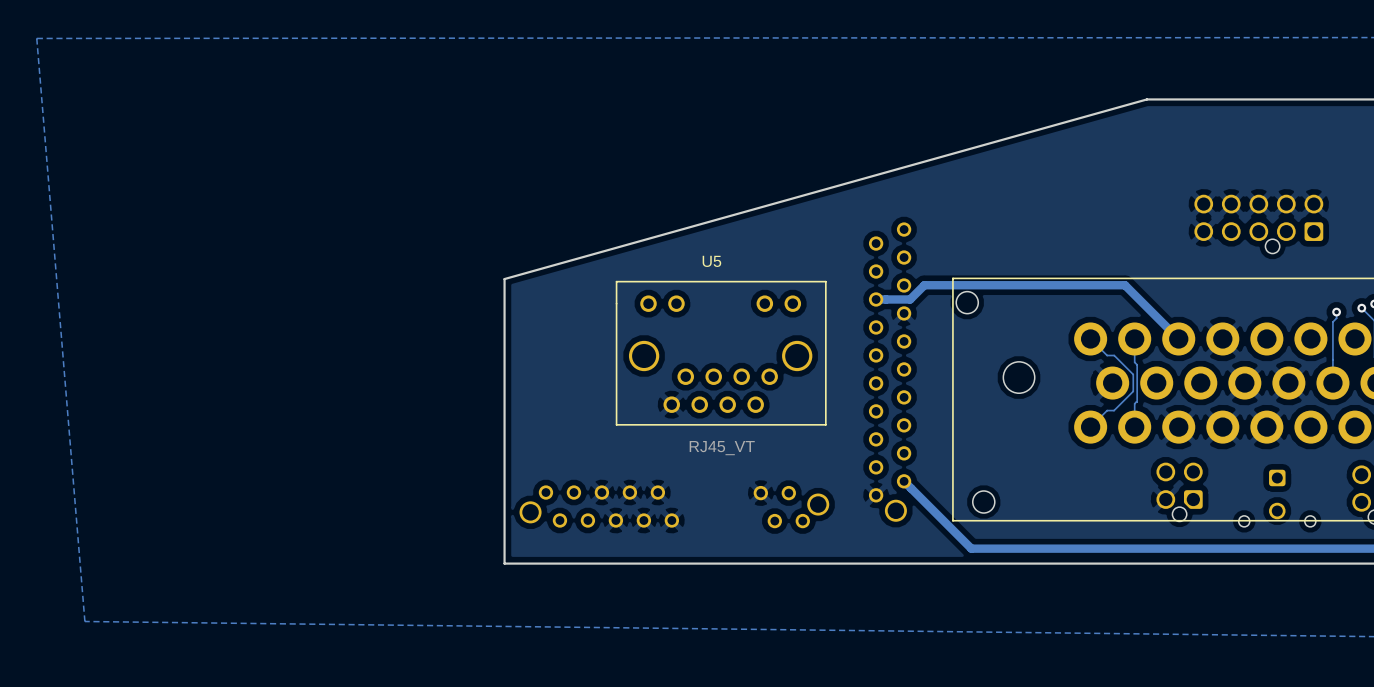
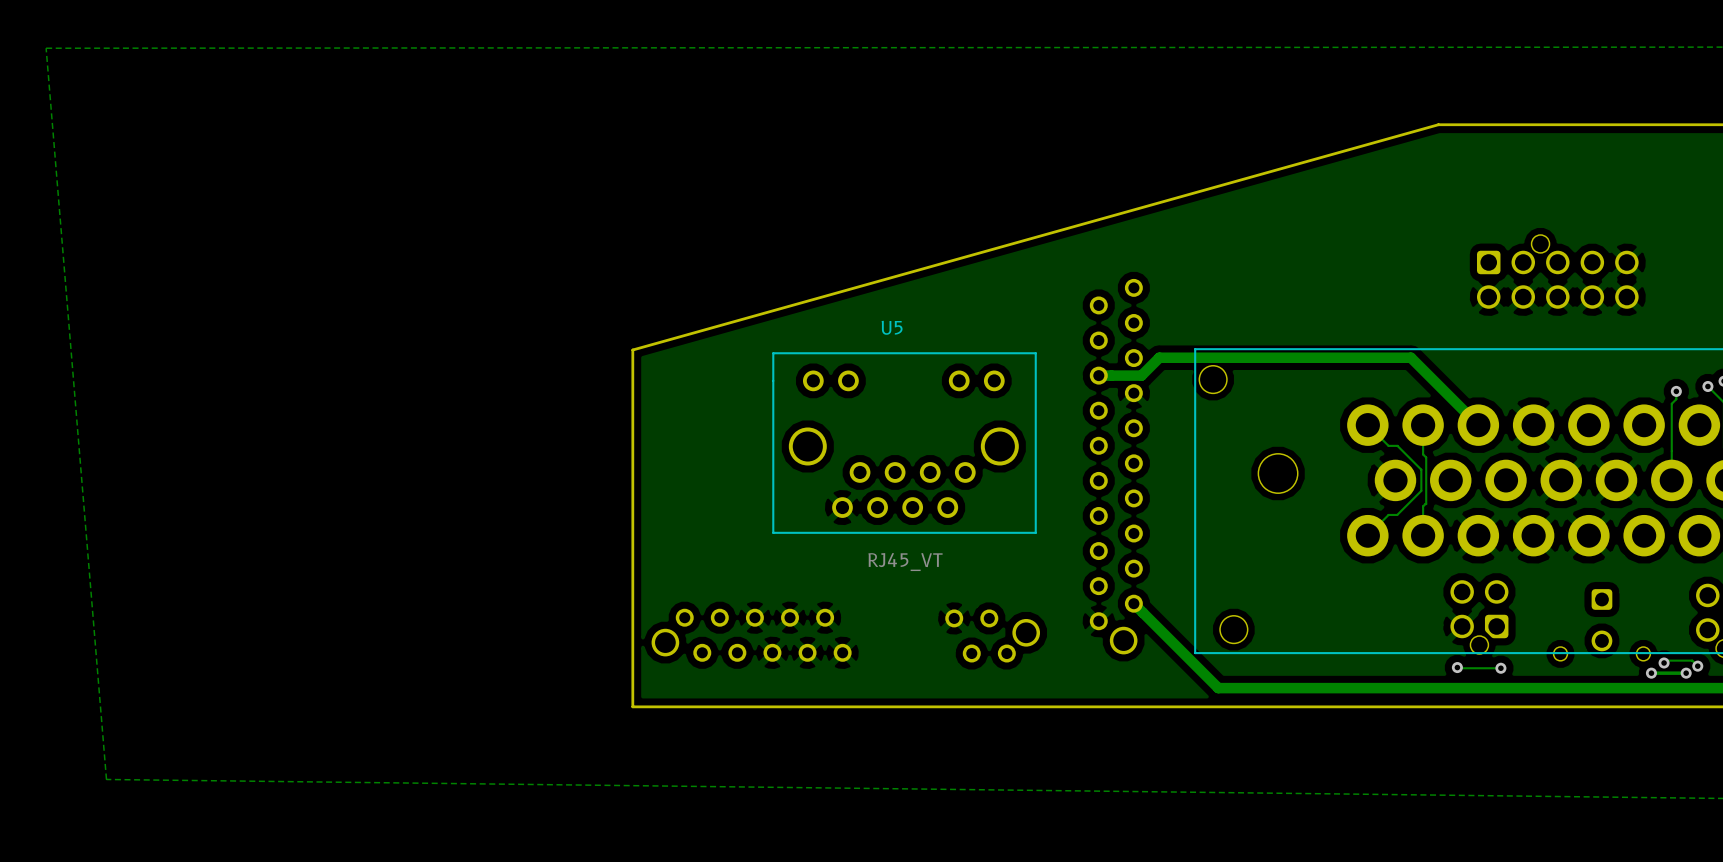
part rotation: 0° (1258, 224) -> 180° (1557, 271)
track: none -> (1664, 662) (1666, 660) (1692, 660) (1697, 666)
via: none -> (1664, 662)
via: none -> (1697, 666)
track: none -> (1457, 667) (1500, 668)
via: none -> (1457, 667)
via: none -> (1500, 668)
via: none -> (1651, 673)
track: none -> (1686, 673) (1651, 673)
via: none -> (1686, 673)

